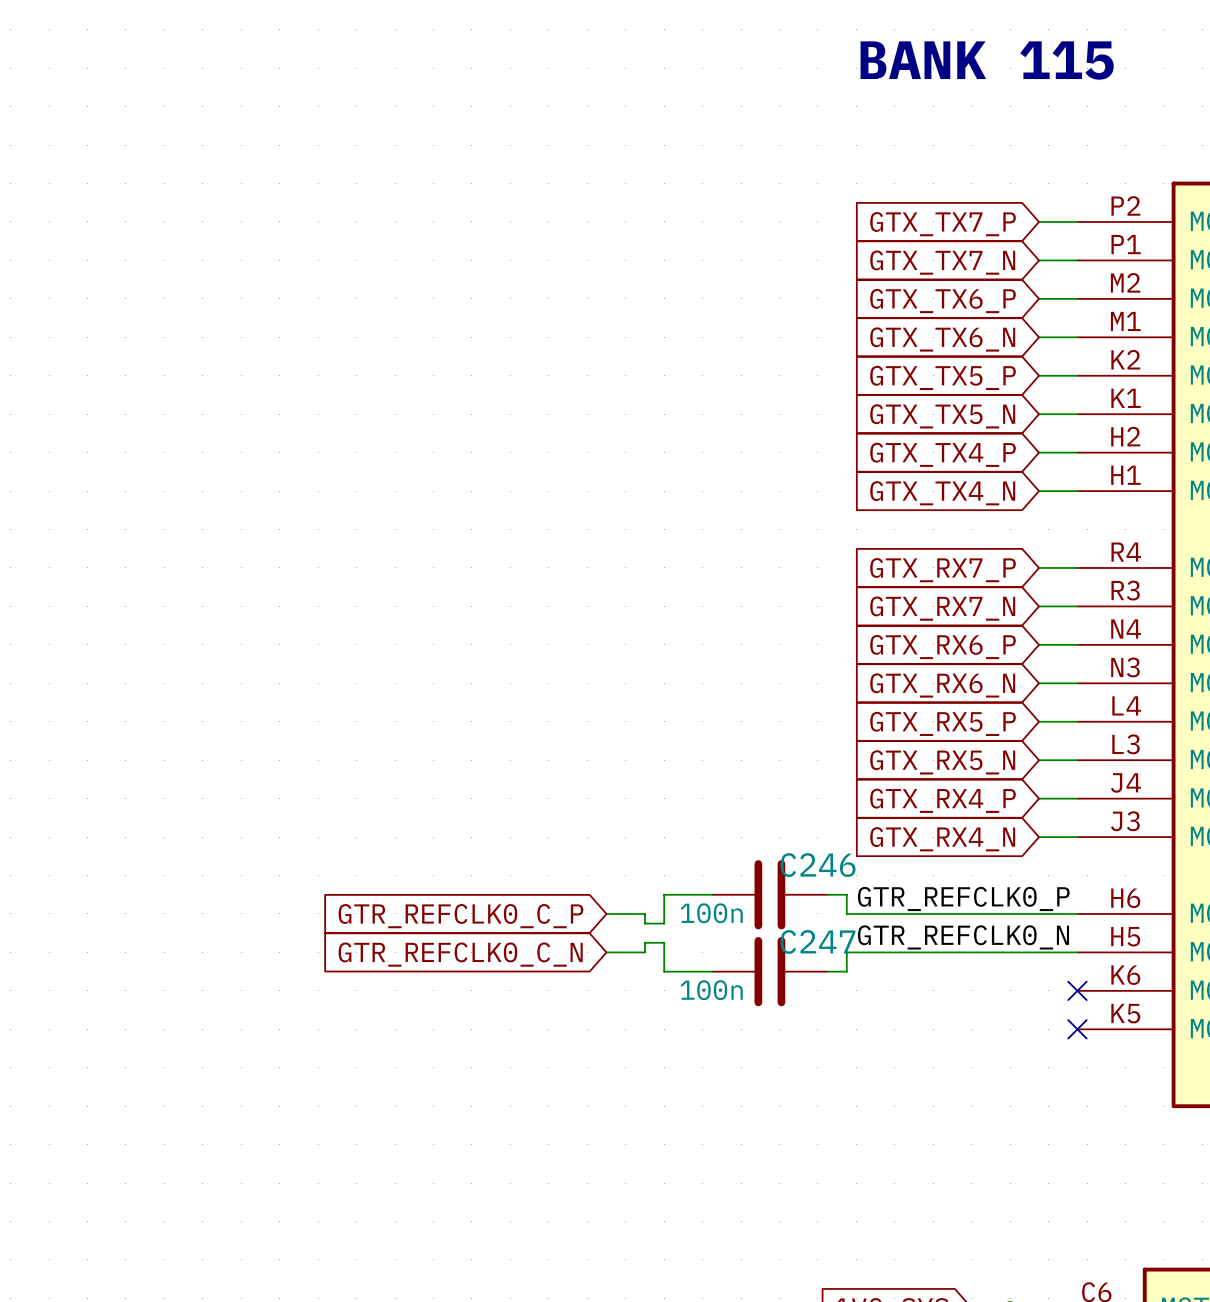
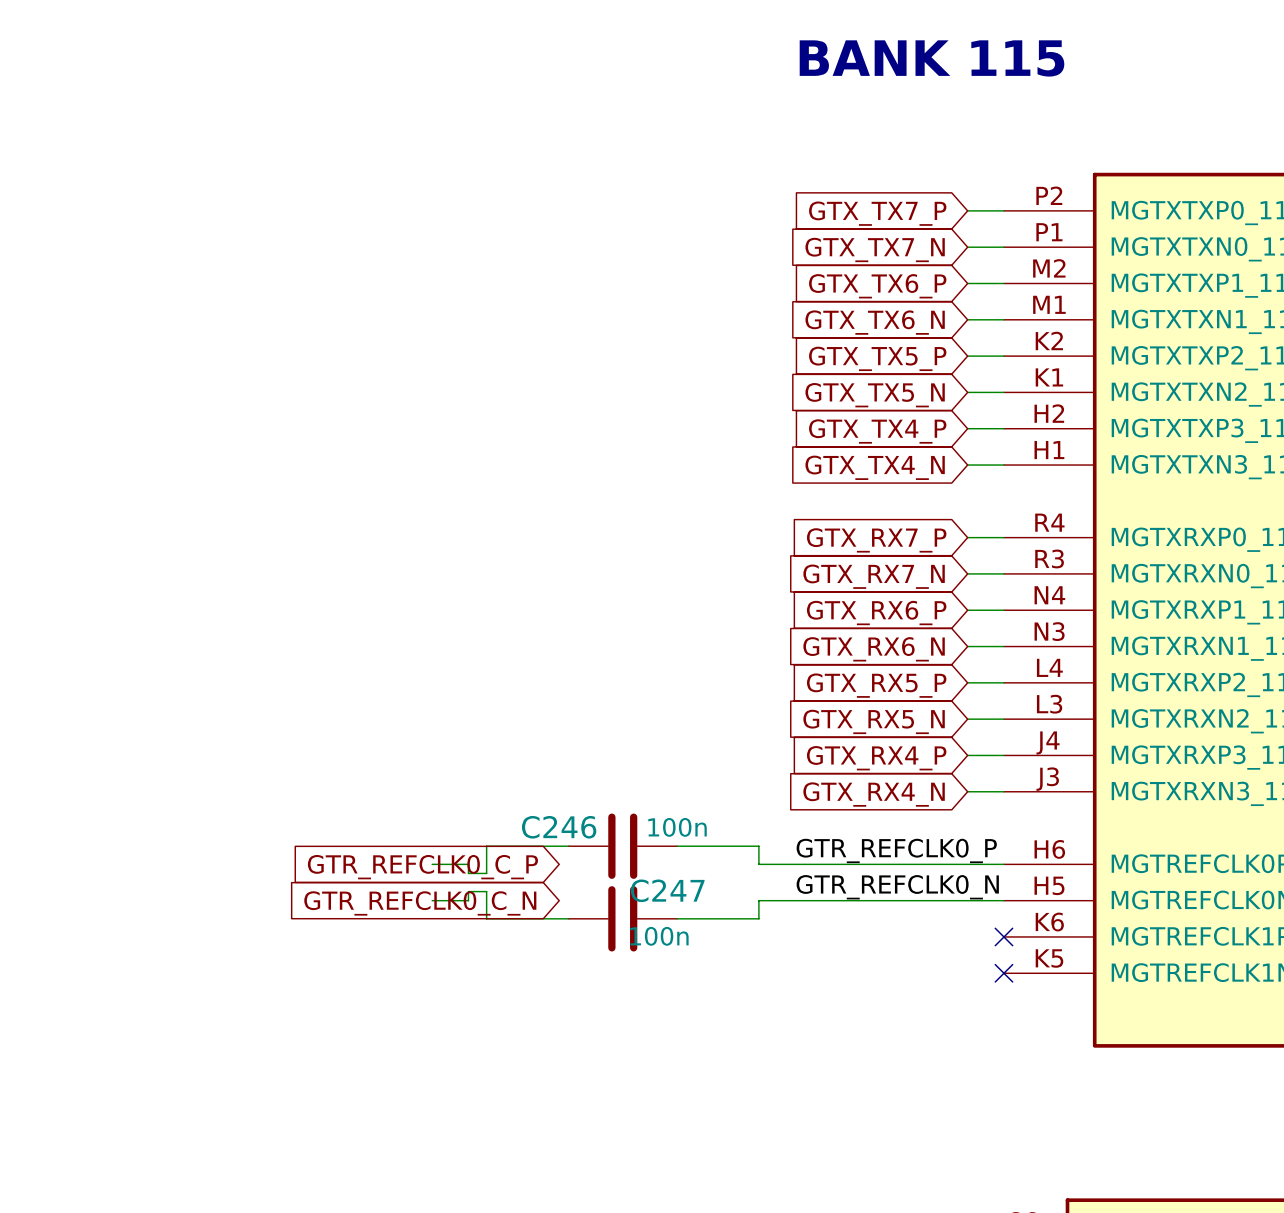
C246 name position: C246 (818, 865) -> C246 (559, 827)
wire: none -> (568, 846) (486, 846) (486, 873) (468, 873) (468, 864) (432, 864)
wire: (712, 894) (664, 894) (664, 923) (644, 923) (644, 913) (606, 913) -> none
C246 position: (769, 894) -> (622, 846)
wire: (827, 894) (846, 894) (846, 913) -> (677, 846) (758, 846) (758, 864) (786, 864)
C246 text position: 100n (711, 913) -> 100n (677, 827)
wire: none -> (432, 900) (468, 900) (468, 891) (486, 891) (486, 918) (568, 918)
wire: (606, 952) (644, 952) (644, 942) (664, 942) (664, 971) (712, 971) -> none
wire: (846, 952) (846, 971) (827, 971) -> (786, 900) (758, 900) (758, 918) (677, 918)
C247 position: (769, 971) -> (622, 918)

